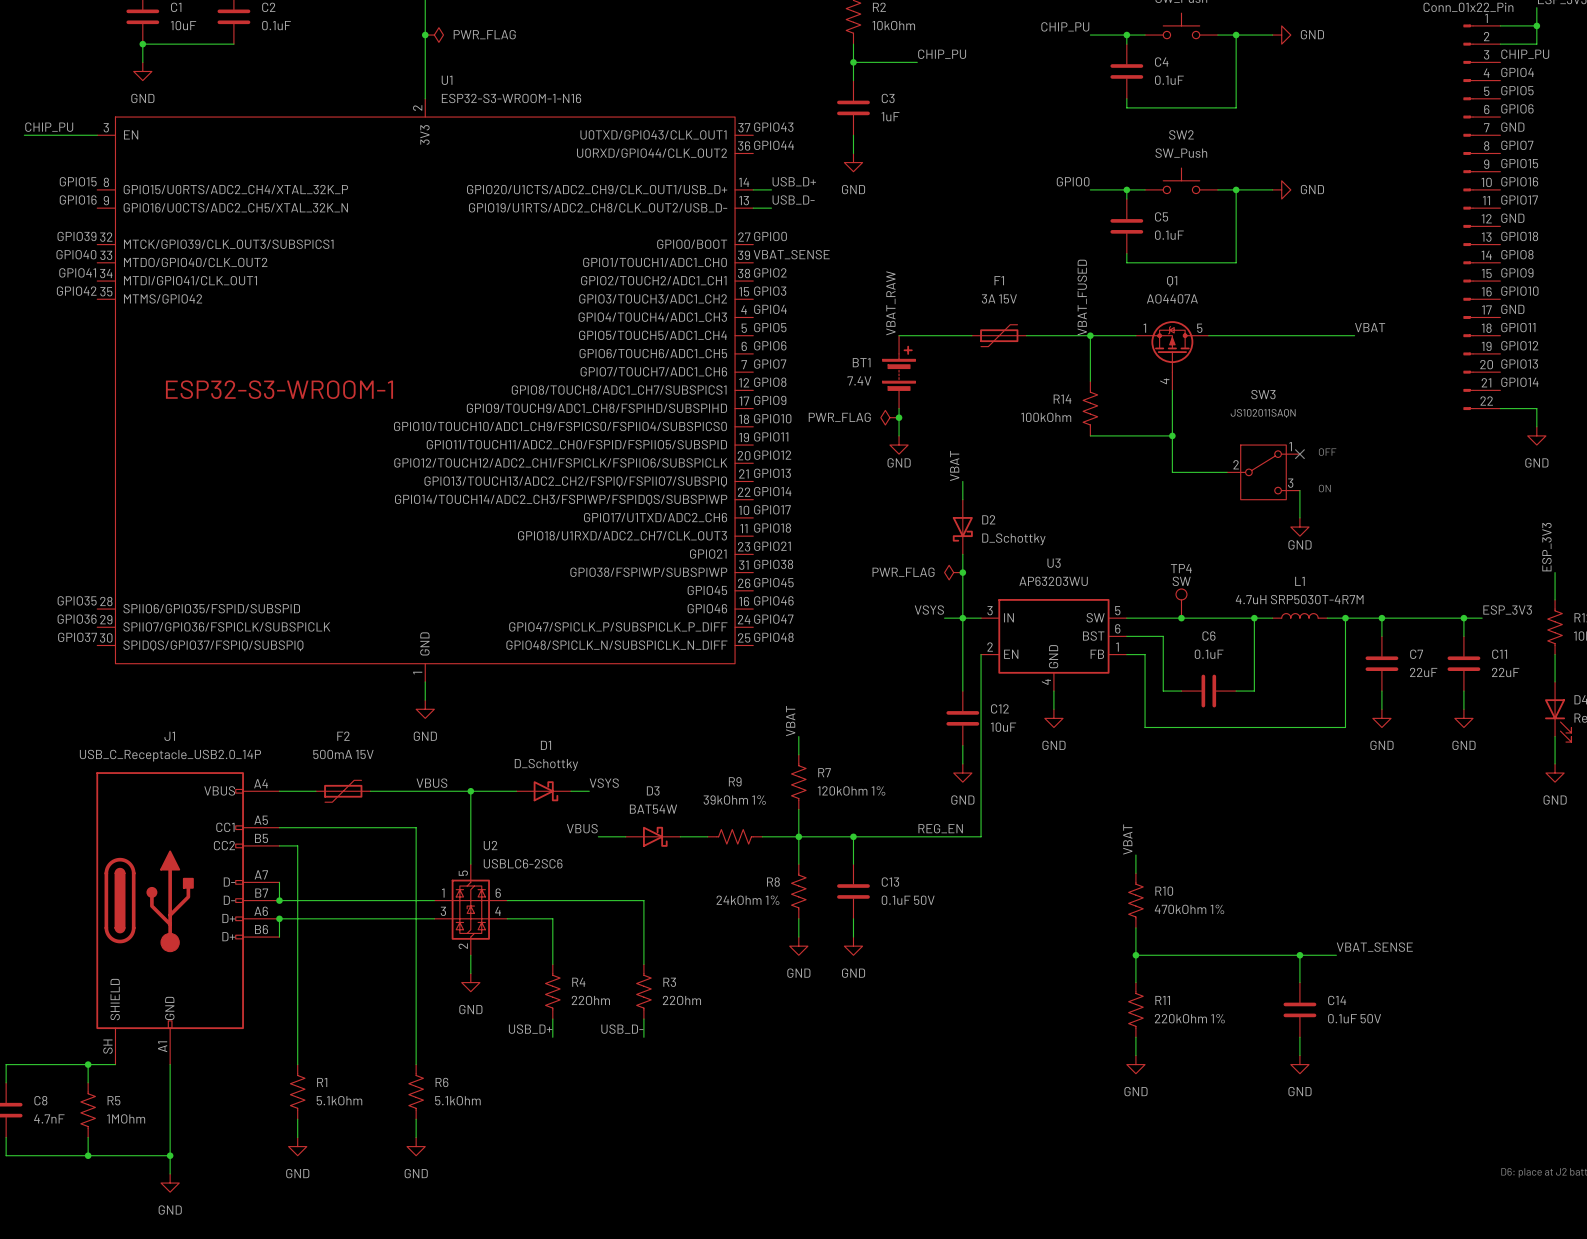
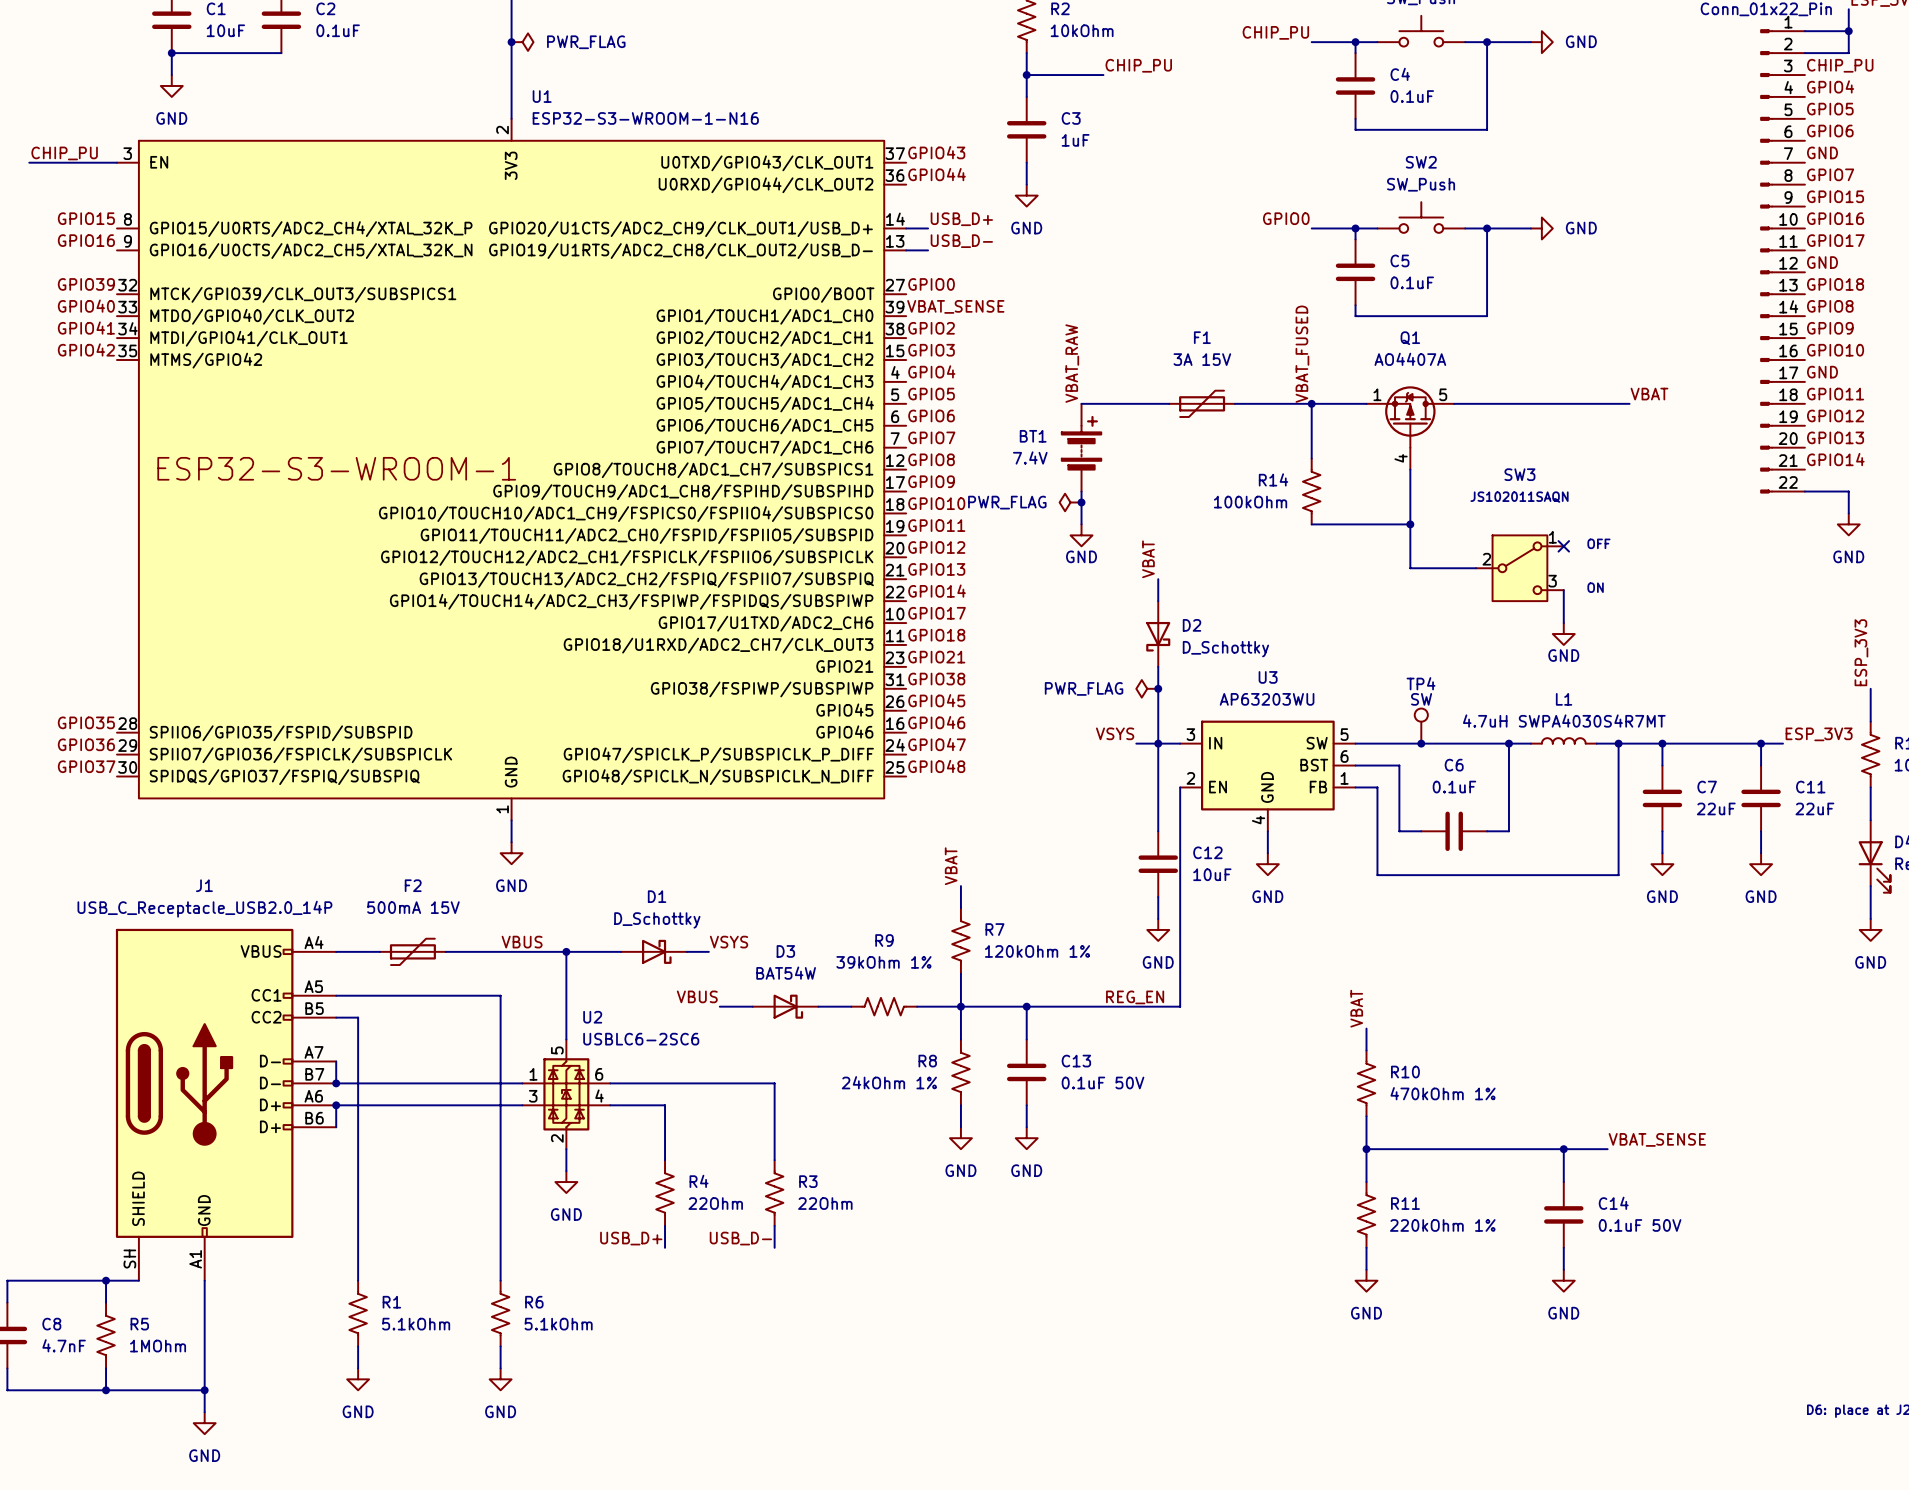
L1 value: 4.7uH SRP5030T-4R7M (1299, 599) -> 4.7uH SWPA4030S4R7MT (1564, 721)

